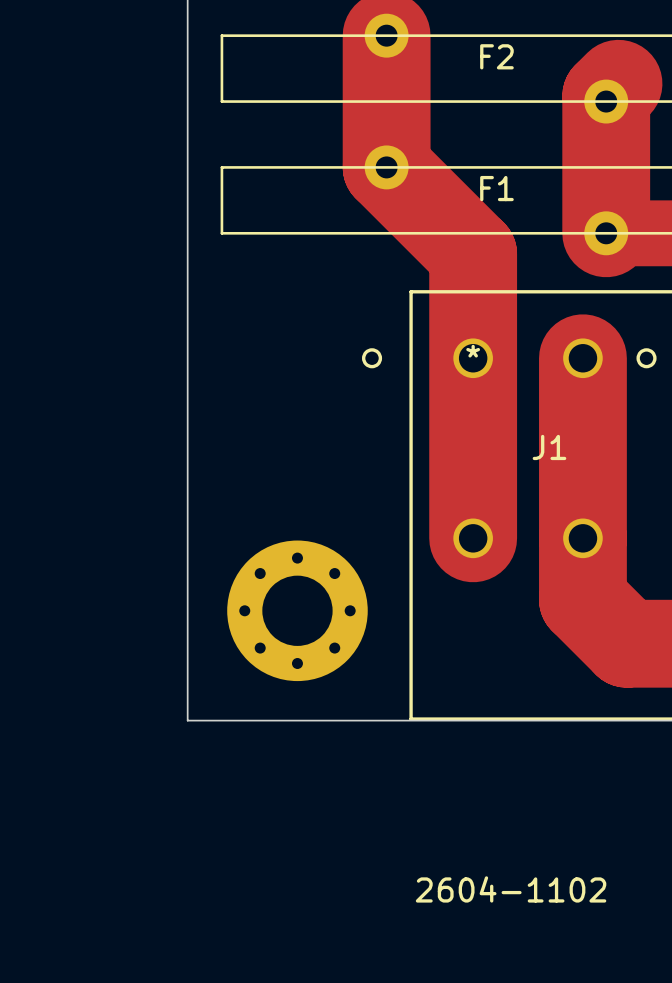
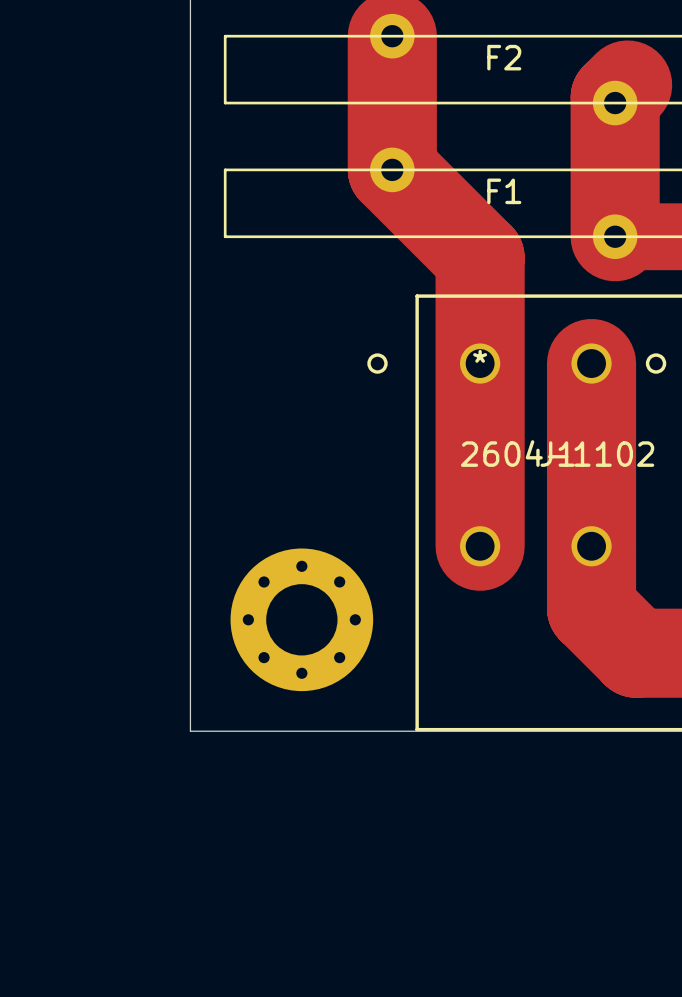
J1 value position: 2604-1102 (511, 889) -> 2604-1102 (557, 453)

